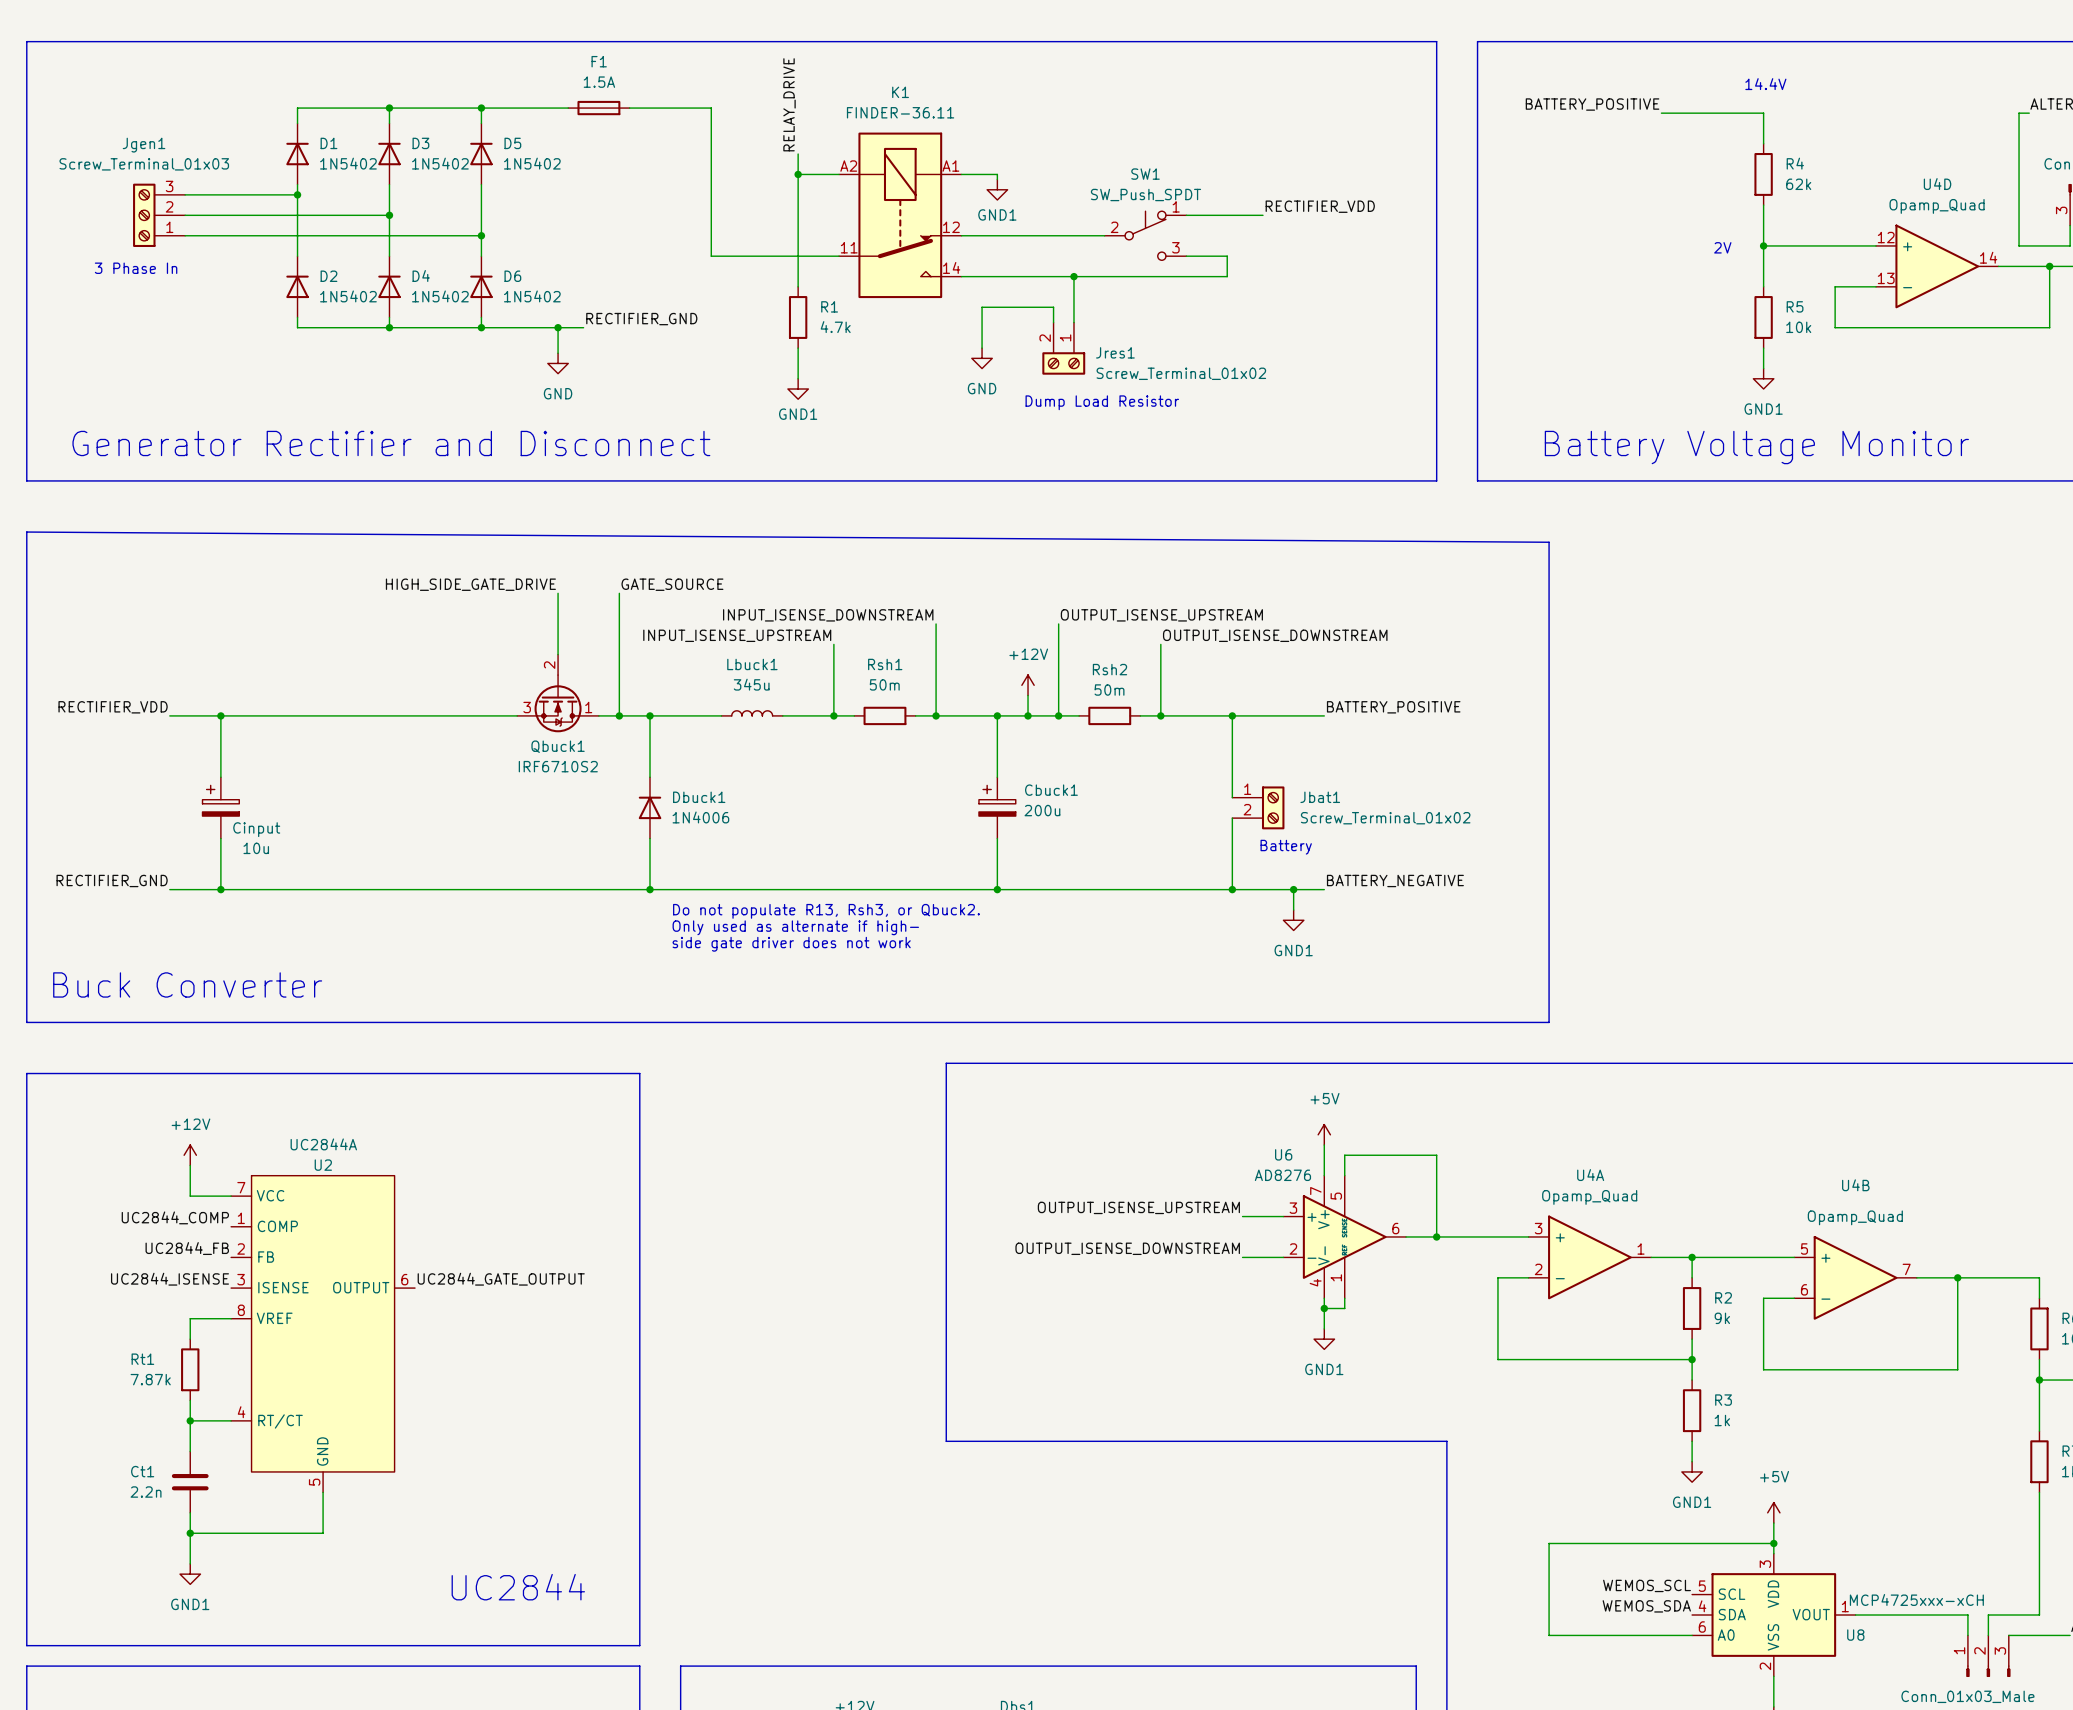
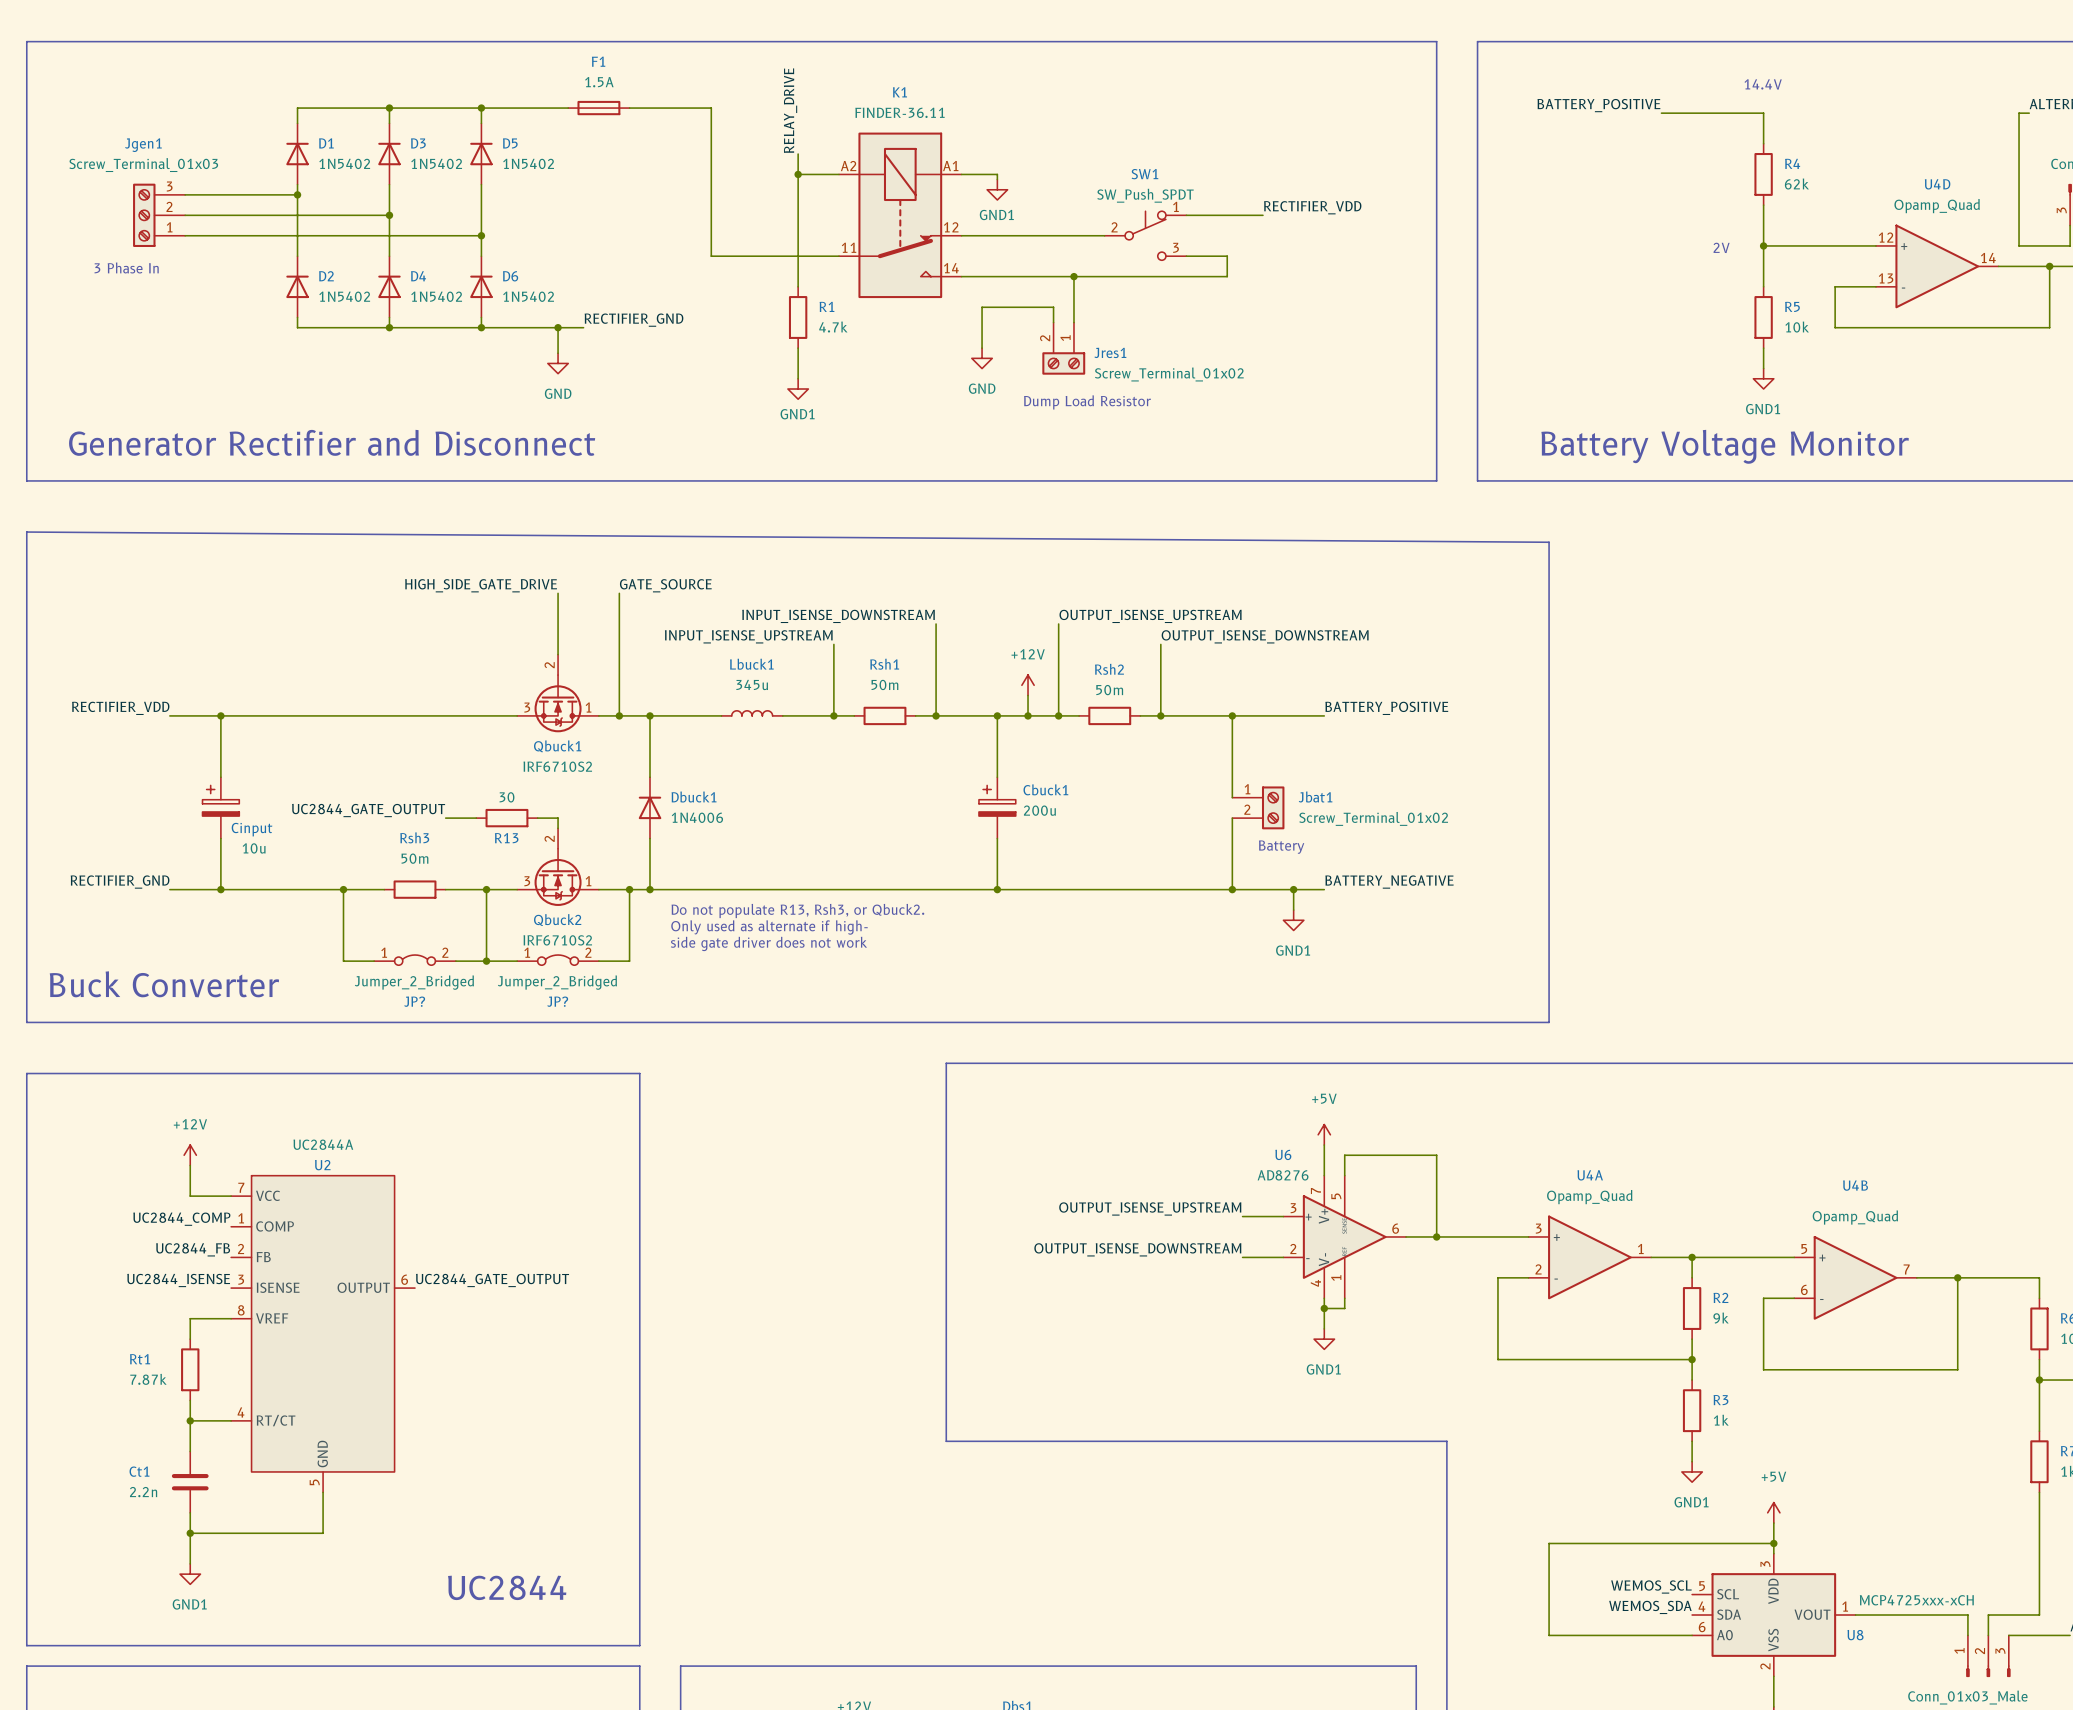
label: none -> UC2844_GATE_OUTPUT (368, 810)
wire: none -> (445, 818) (476, 818)
R13: none -> 30 (506, 818)
wire: none -> (537, 818) (558, 818) (558, 828)
Qbuck2: none -> IRF6710S2 (558, 867)
wire: none -> (343, 889) (343, 961) (374, 961)
junction: none -> (343, 889)
wire: (384, 889) (445, 889) -> (455, 961) (517, 961)
Rsh3: none -> 50m (415, 889)
wire: none -> (486, 889) (486, 961)
junction: none -> (486, 889)
wire: none -> (629, 889) (629, 961) (598, 961)
junction: none -> (629, 889)
JP?: none -> Jumper_2_Bridged (415, 960)
JP?: none -> Jumper_2_Bridged (558, 960)
junction: none -> (486, 961)

